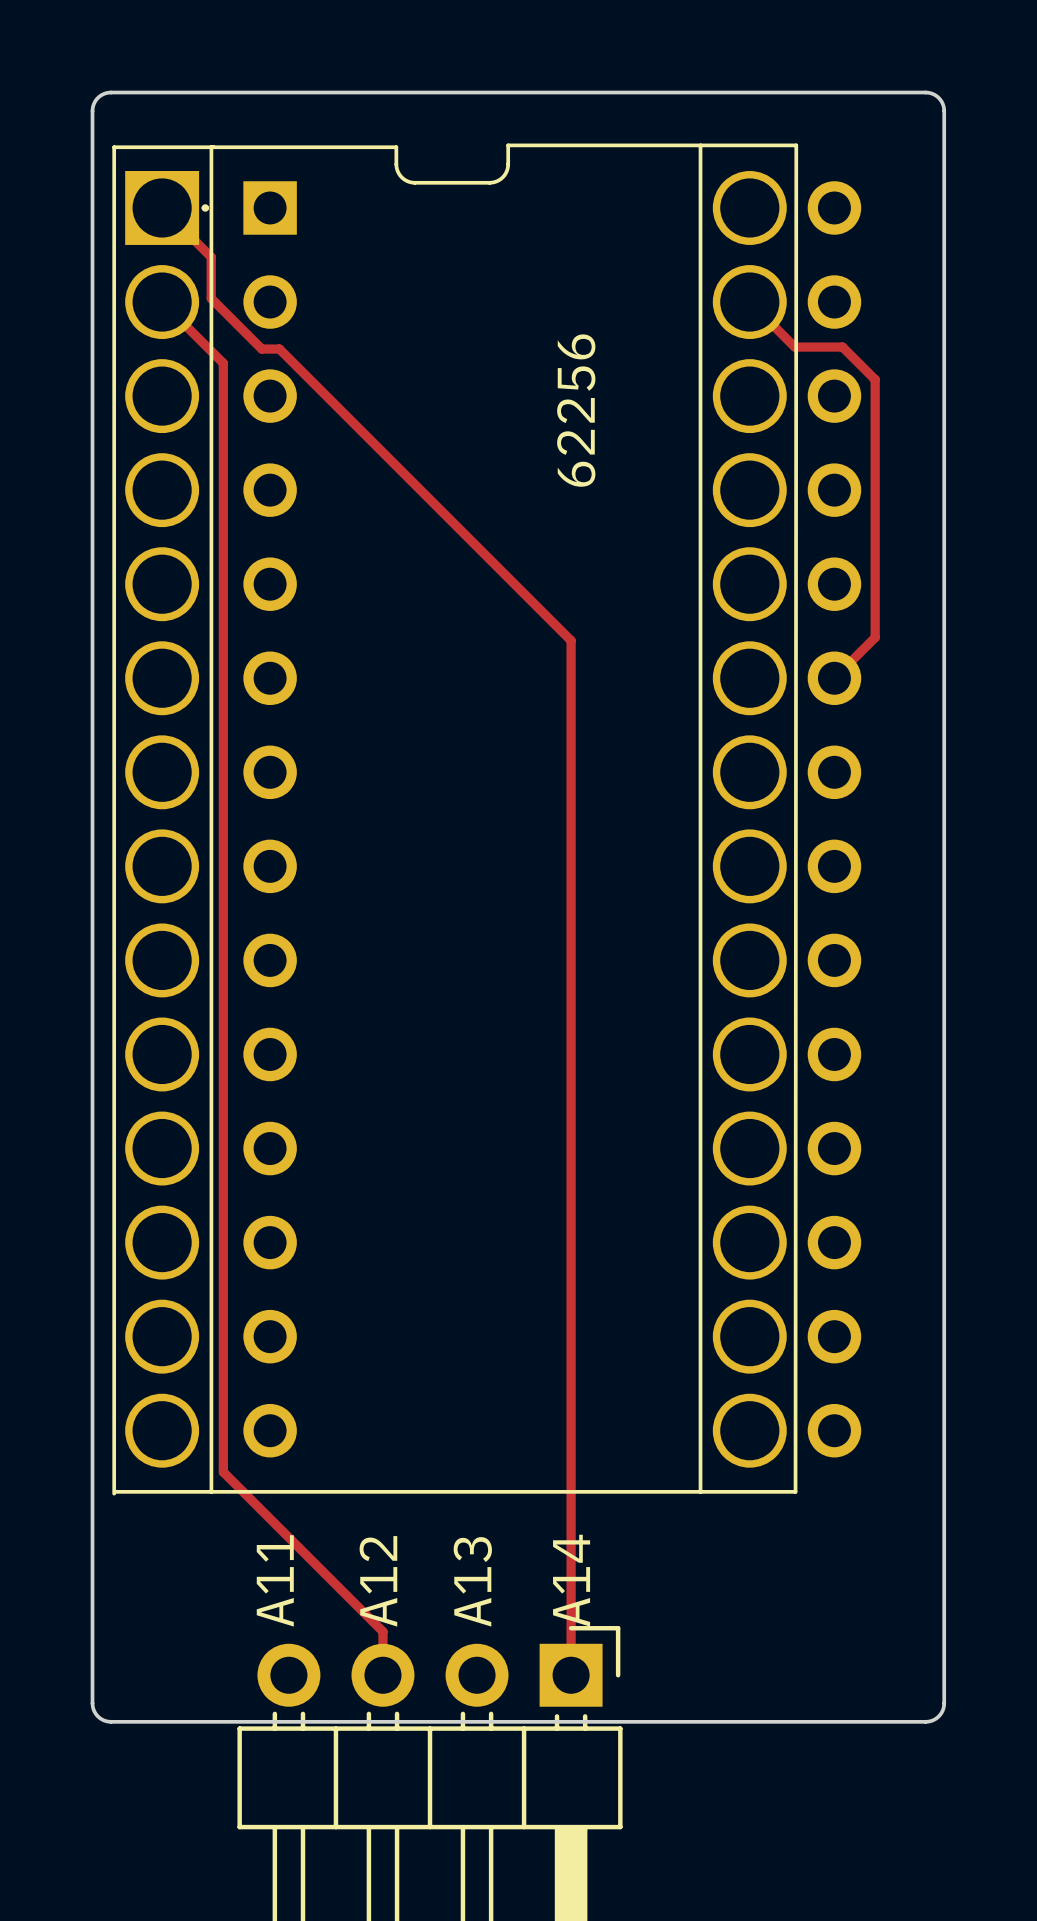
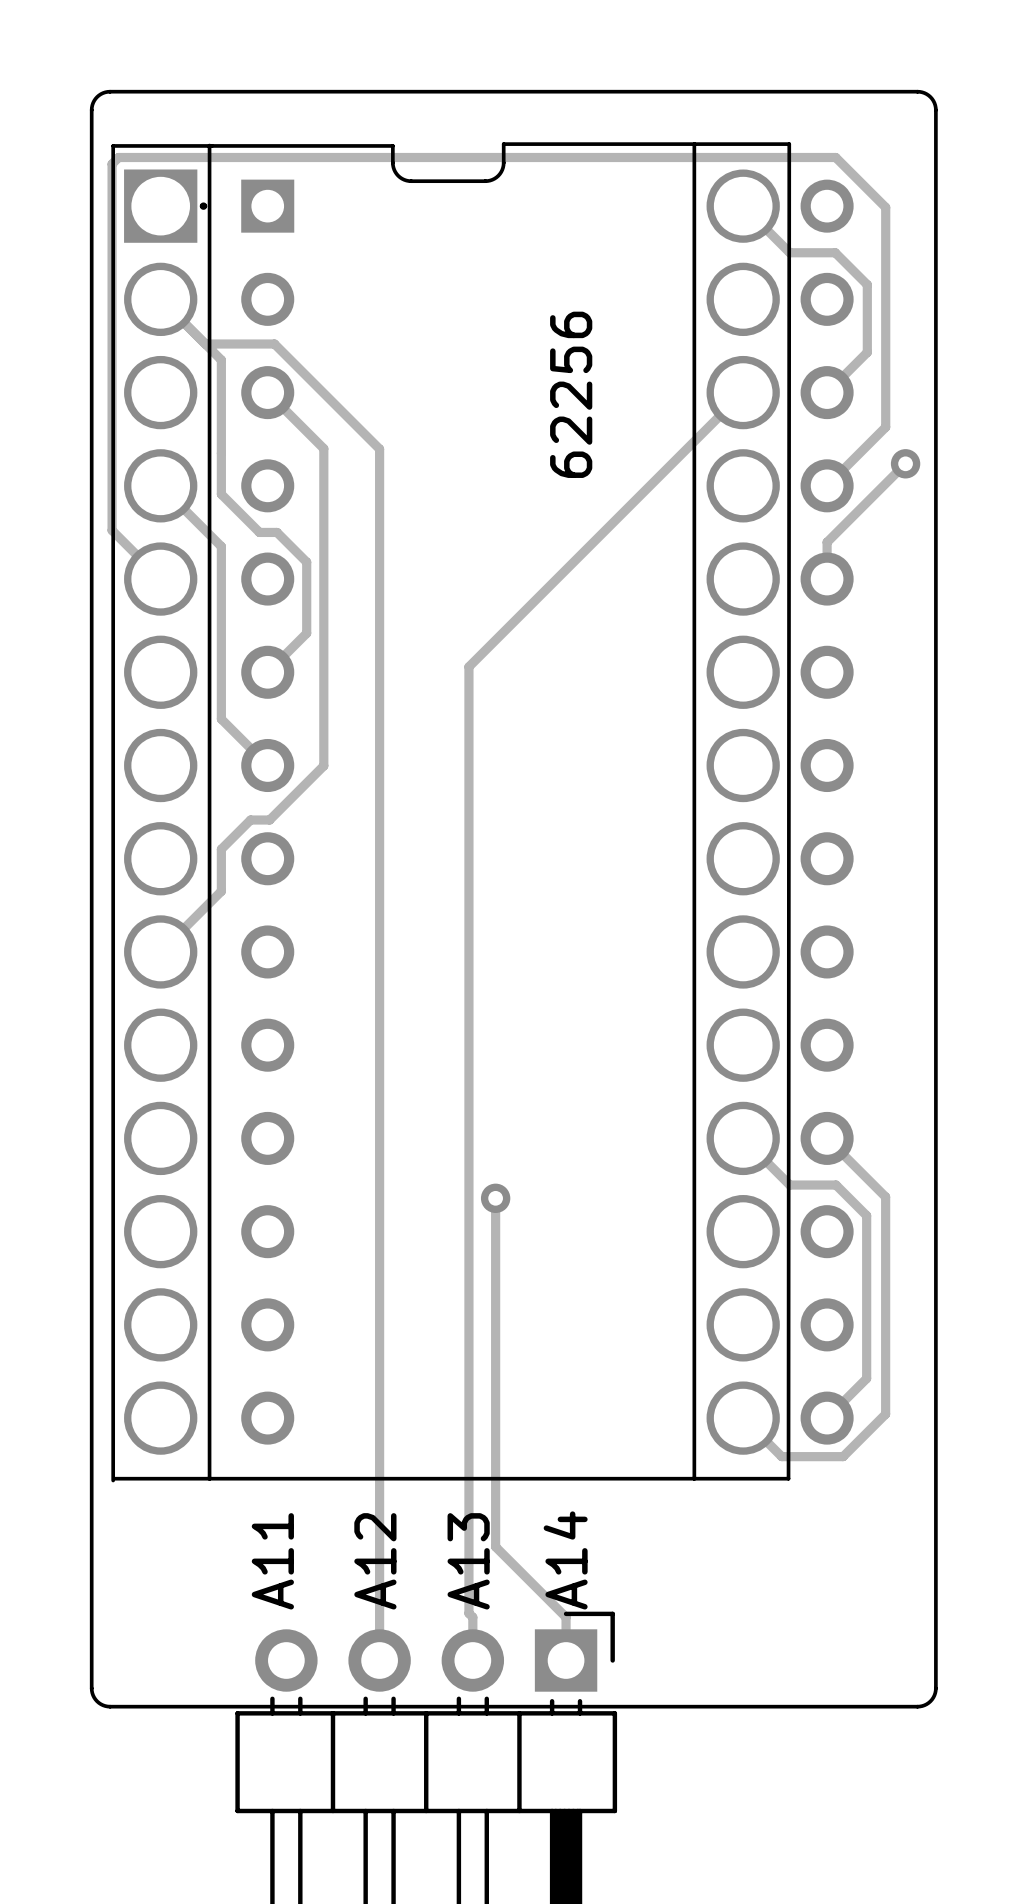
track: (162, 207) (211, 257) (211, 298) (261, 349) (279, 349) (571, 640) (571, 1631) -> (495, 1198) (495, 1546) (566, 1617)
track: none -> (743, 206) (789, 252) (835, 252) (867, 284) (867, 352) (827, 392)
track: (749, 302) (794, 347) (842, 347) (875, 379) (875, 637) (834, 678) -> none
track: none -> (267, 392) (323, 448) (323, 765) (269, 820) (250, 820) (221, 849)
track: none -> (743, 392) (468, 666) (468, 1613) (472, 1617) (472, 1660)
track: none -> (905, 463) (827, 542) (827, 579)
via: none -> (905, 463)
track: none -> (827, 485) (885, 427) (885, 207) (835, 157) (118, 157) (112, 164) (112, 530) (160, 579)
track: (223, 498) (223, 551) -> (160, 485) (221, 546)
track: none -> (221, 494) (259, 532) (277, 532) (306, 562) (306, 633) (267, 672)
track: (223, 725) (223, 856) -> (221, 719) (267, 765)
track: (223, 899) (223, 1472) (382, 1631) -> (160, 299) (205, 344) (274, 344) (379, 449) (379, 1617)
track: none -> (221, 891) (160, 951)
track: none -> (743, 1138) (789, 1185) (836, 1185) (866, 1215) (866, 1378) (827, 1418)
track: none -> (827, 1138) (885, 1196) (885, 1414) (843, 1456) (781, 1456) (743, 1418)
via: none -> (495, 1198)

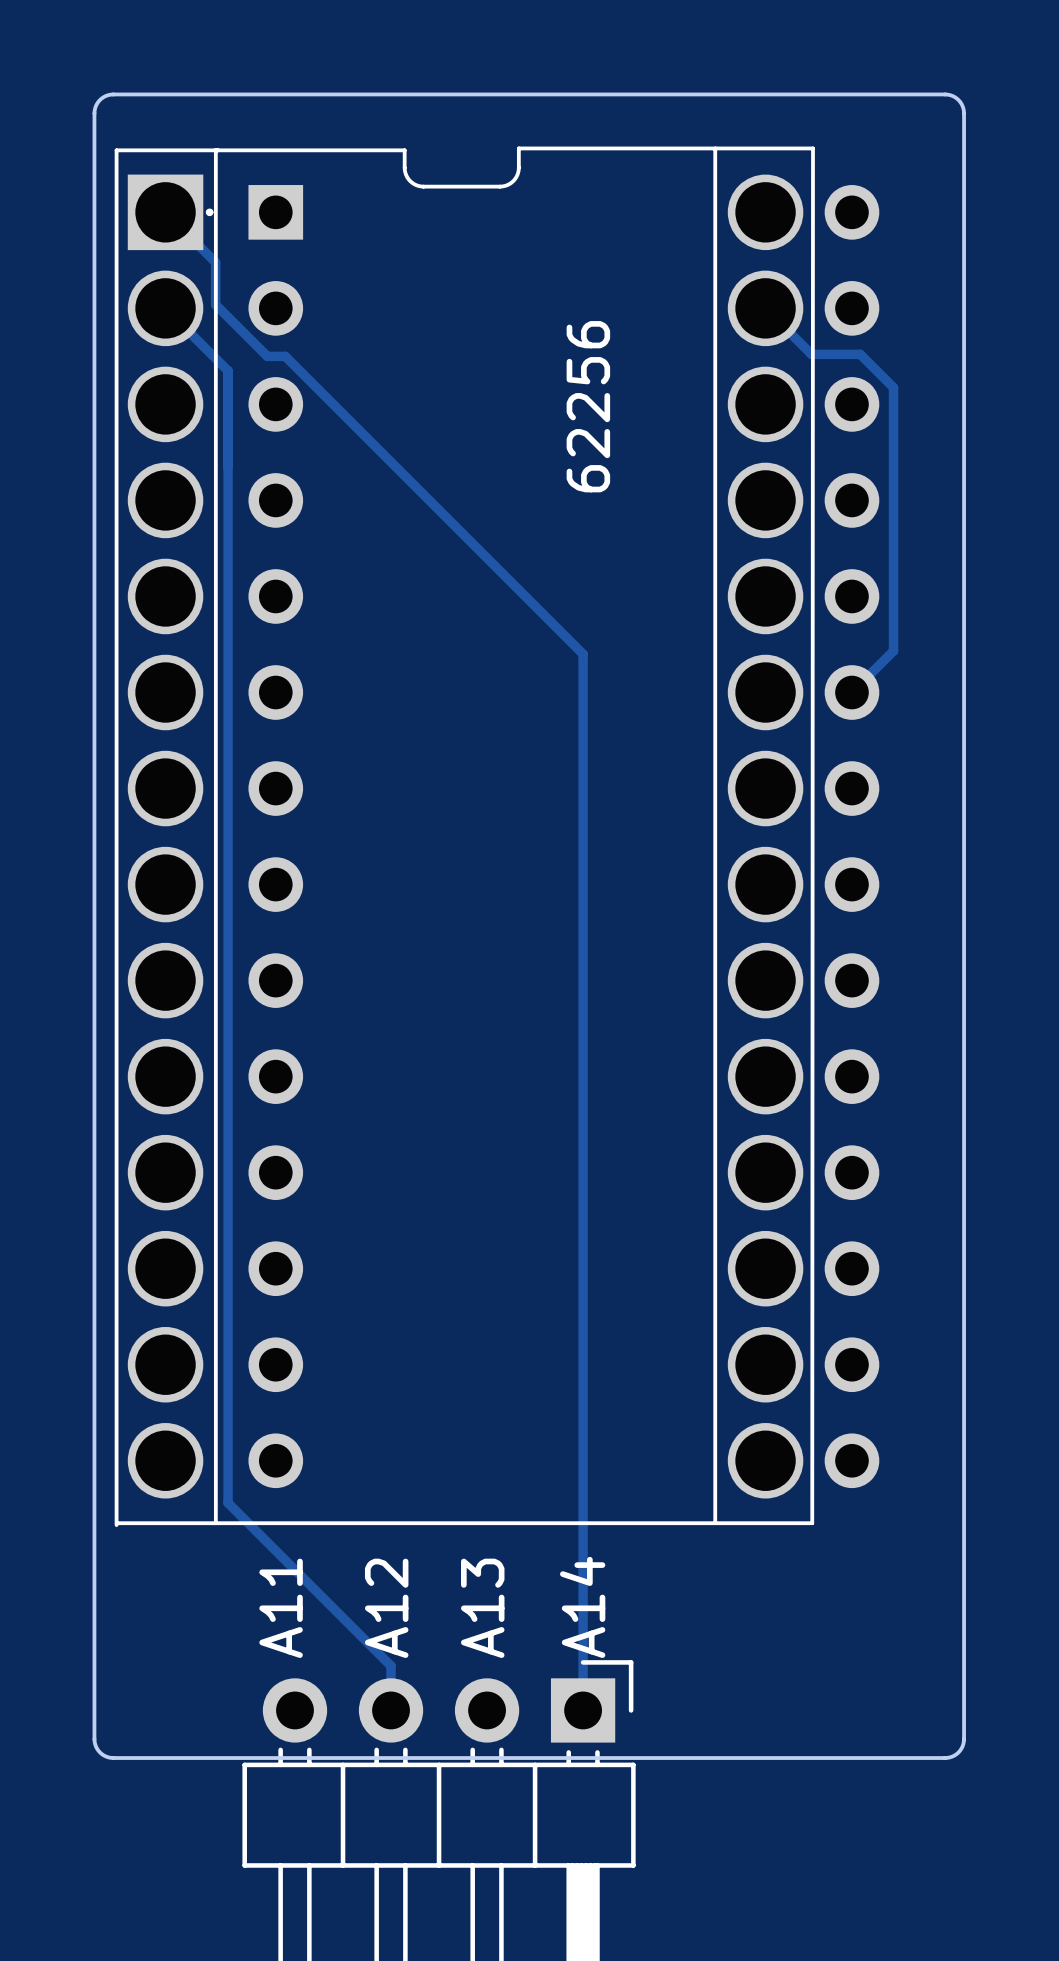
track: (743, 206) (789, 252) (835, 252) (867, 284) (867, 352) (827, 392) -> none
track: (160, 299) (205, 344) (274, 344) (379, 449) (379, 1617) -> (228, 918) (228, 1502) (391, 1665)
track: none -> (765, 308) (811, 354) (860, 354) (893, 387) (893, 650) (851, 692)
track: (267, 392) (323, 448) (323, 765) (269, 820) (250, 820) (221, 849) -> none
track: (743, 392) (468, 666) (468, 1613) (472, 1617) (472, 1660) -> none
track: (905, 463) (827, 542) (827, 579) -> none
via: (905, 463) -> none
track: (160, 485) (221, 546) -> (228, 509) (228, 562)
track: (827, 485) (885, 427) (885, 207) (835, 157) (118, 157) (112, 164) (112, 530) (160, 579) -> none
track: (221, 494) (259, 532) (277, 532) (306, 562) (306, 633) (267, 672) -> none
track: (221, 719) (267, 765) -> (228, 740) (228, 874)
track: (221, 891) (160, 951) -> none
track: (743, 1138) (789, 1185) (836, 1185) (866, 1215) (866, 1378) (827, 1418) -> none
track: (827, 1138) (885, 1196) (885, 1414) (843, 1456) (781, 1456) (743, 1418) -> none
track: (495, 1198) (495, 1546) (566, 1617) -> (165, 212) (215, 262) (215, 304) (267, 356) (285, 356) (583, 654) (583, 1665)
via: (495, 1198) -> none

